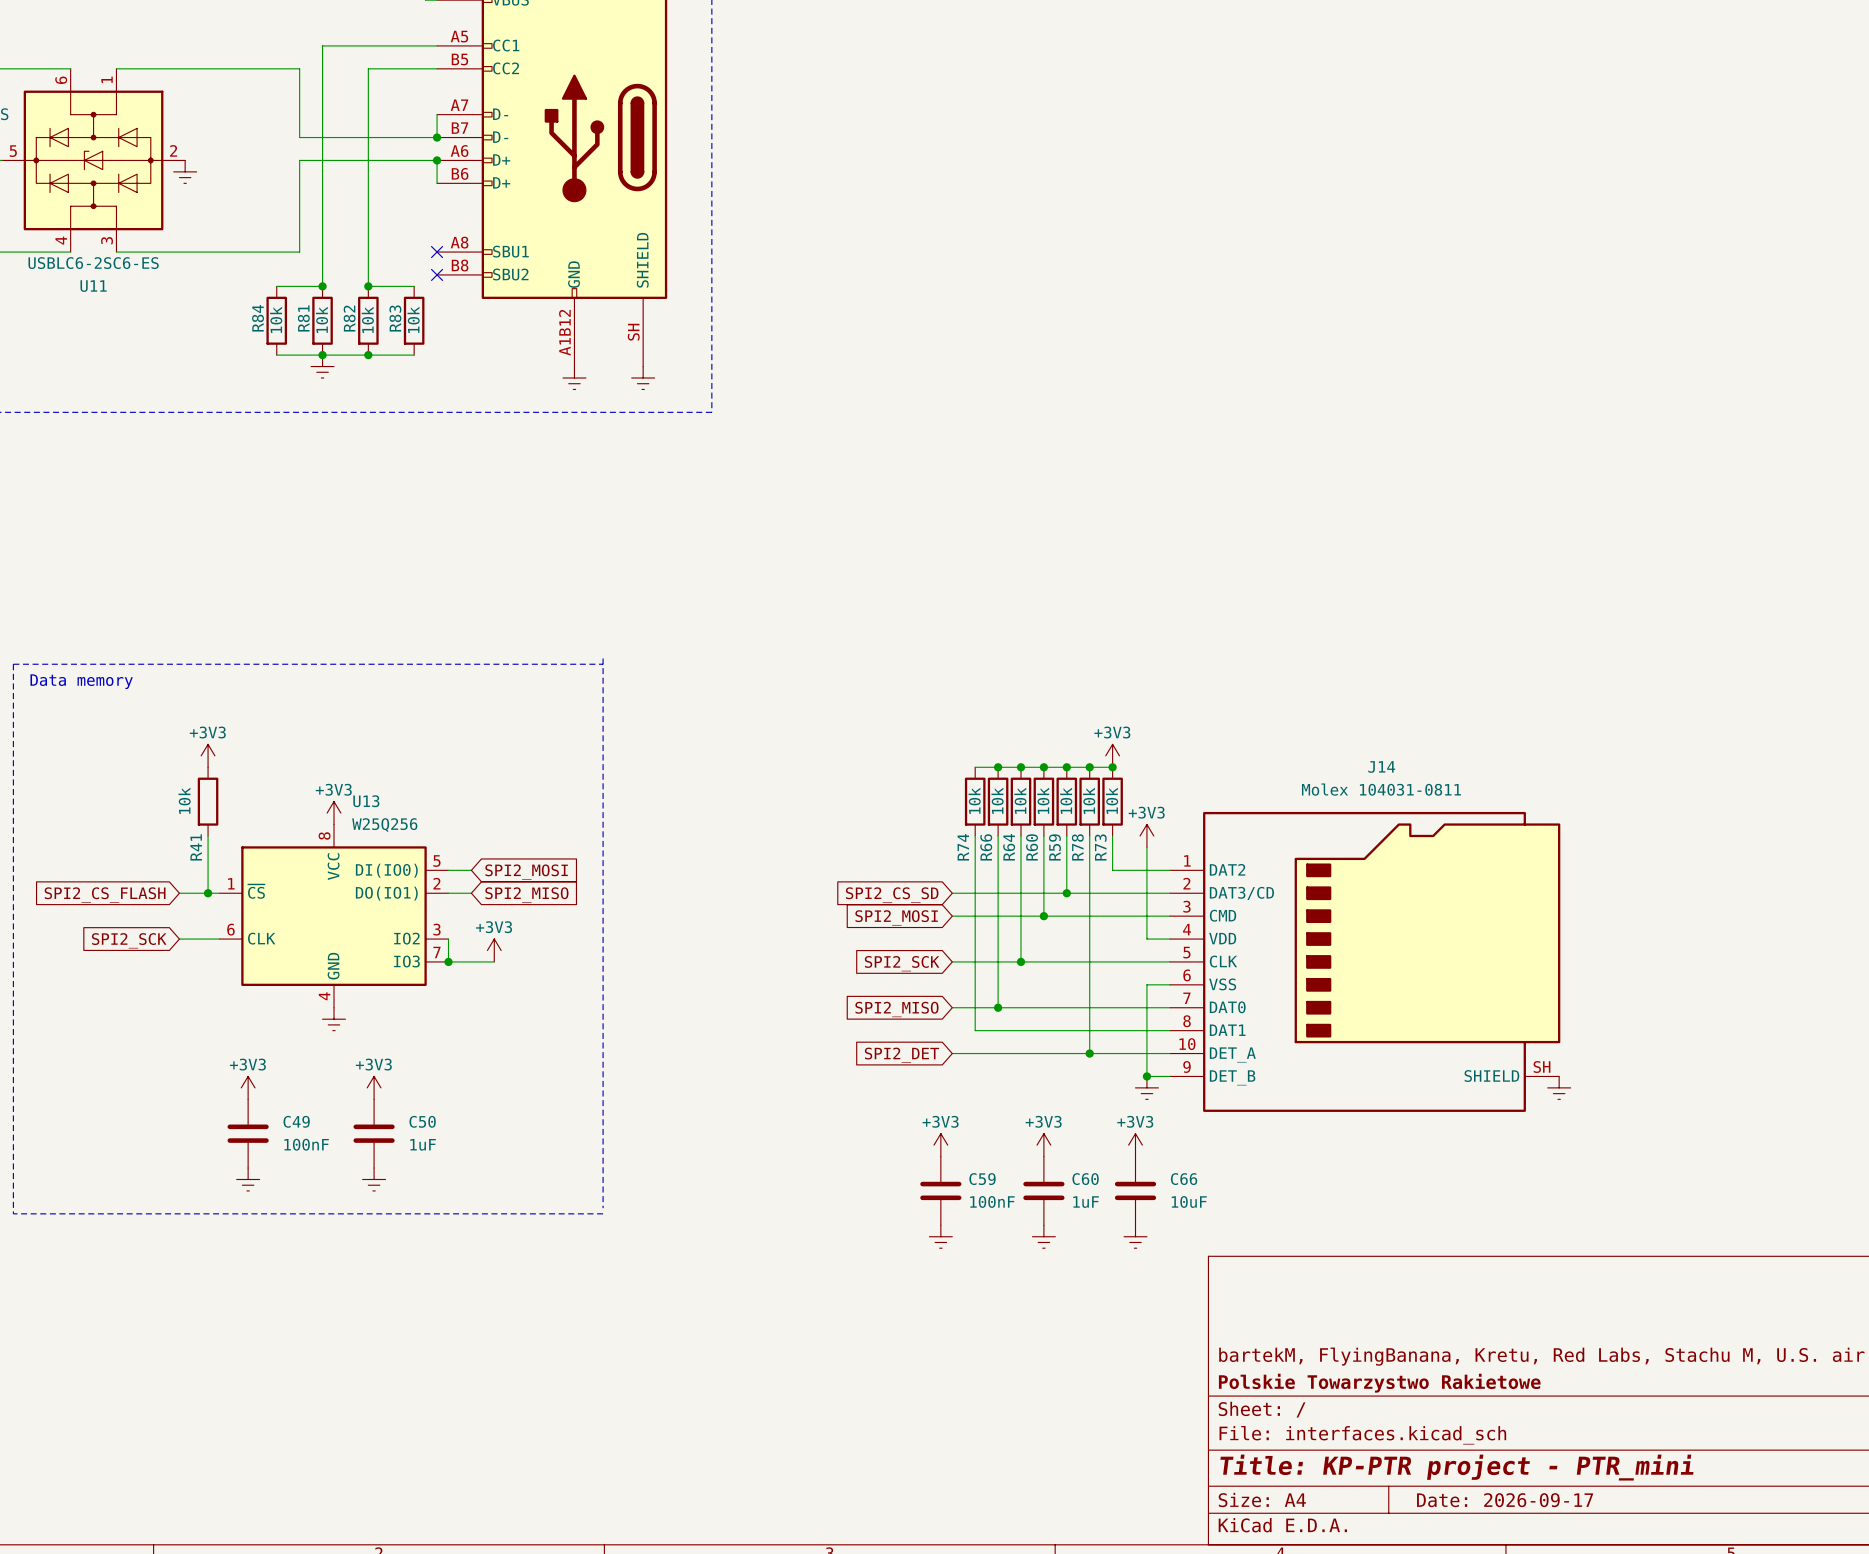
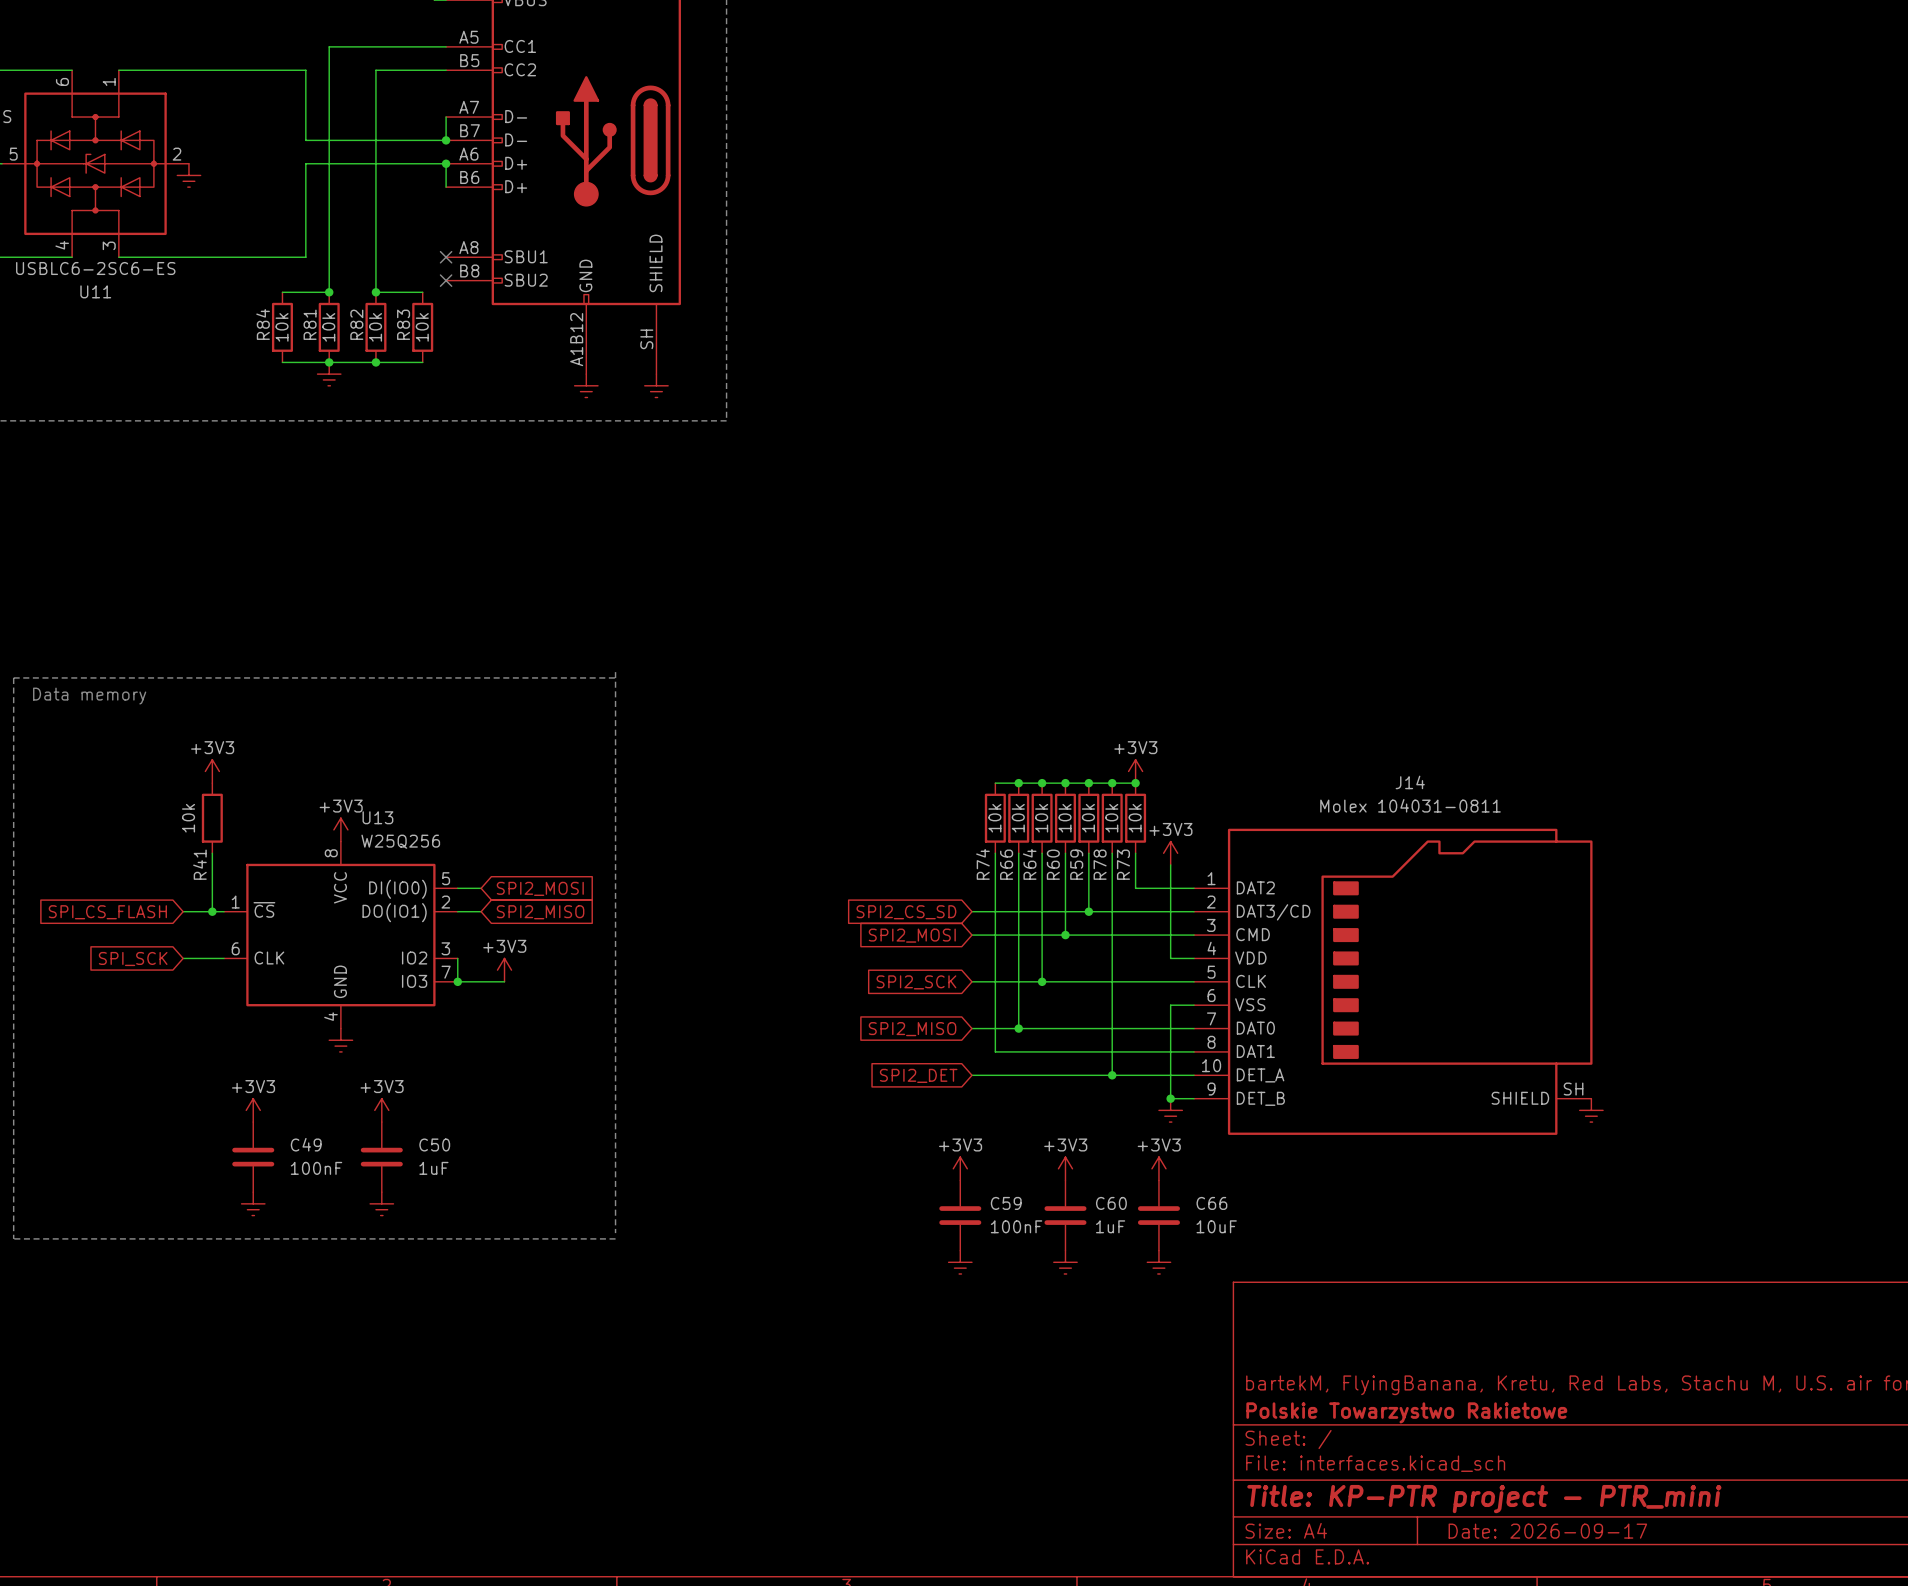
global label: SPI2_CS_FLASH (105, 894) -> SPI_CS_FLASH (107, 912)
global label: SPI2_SCK (129, 940) -> SPI_SCK (133, 959)

